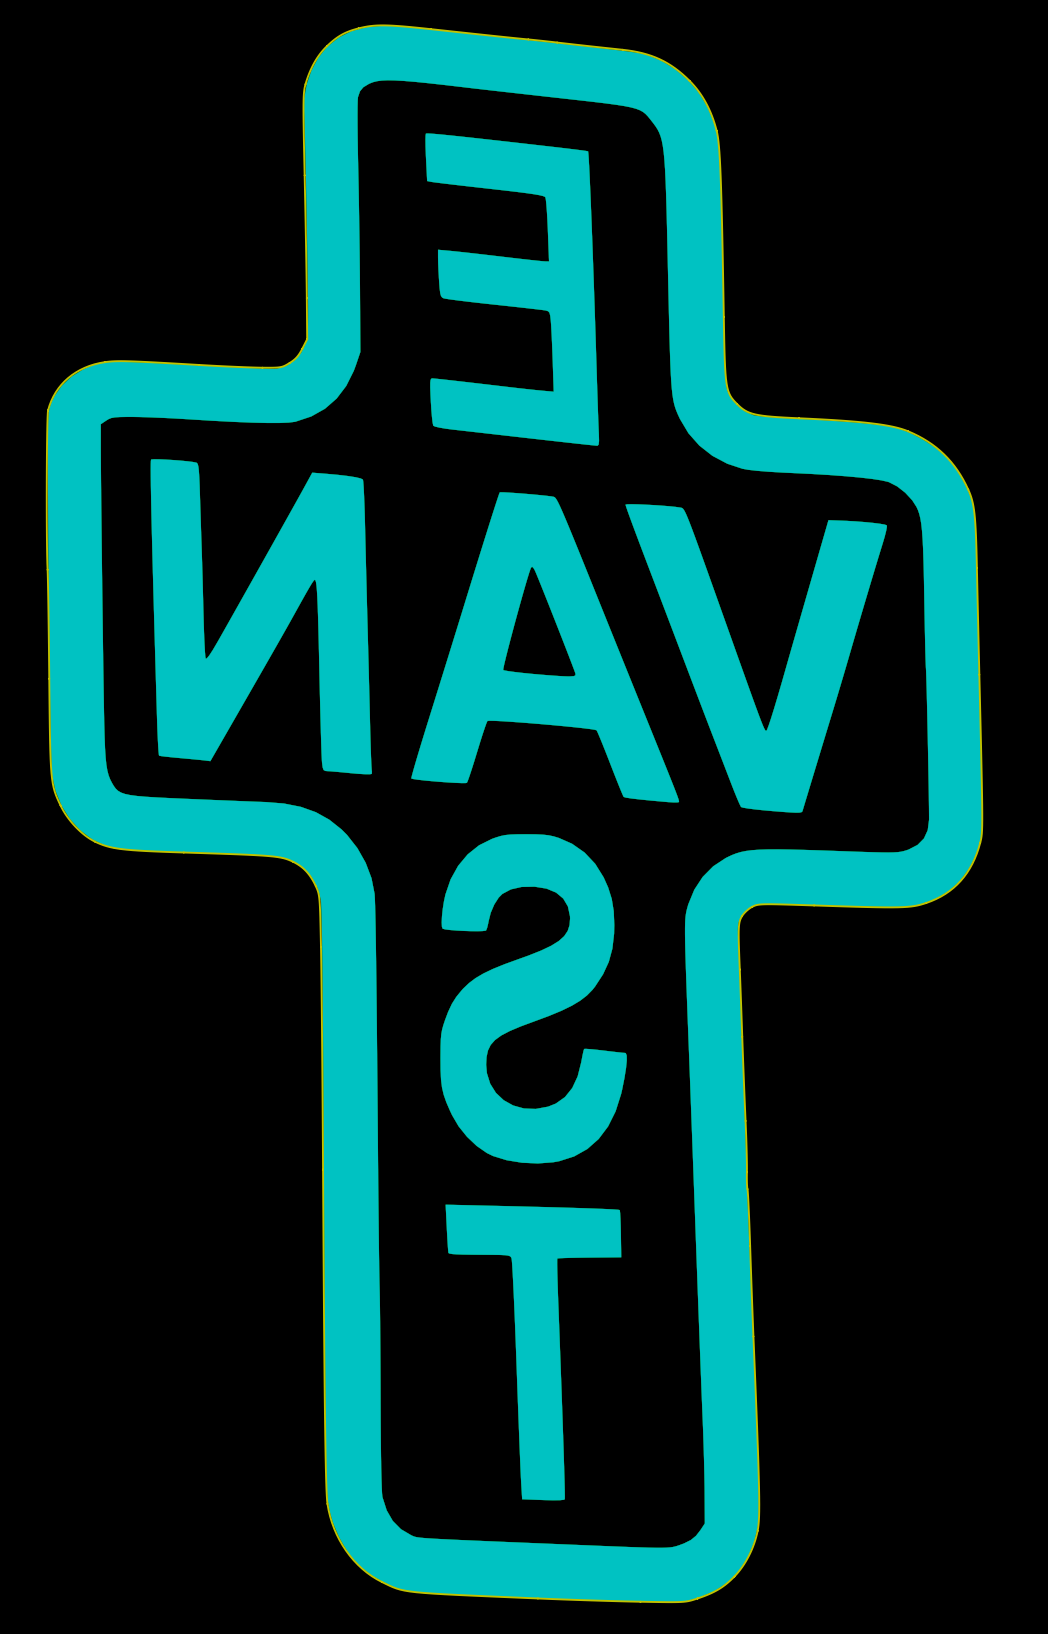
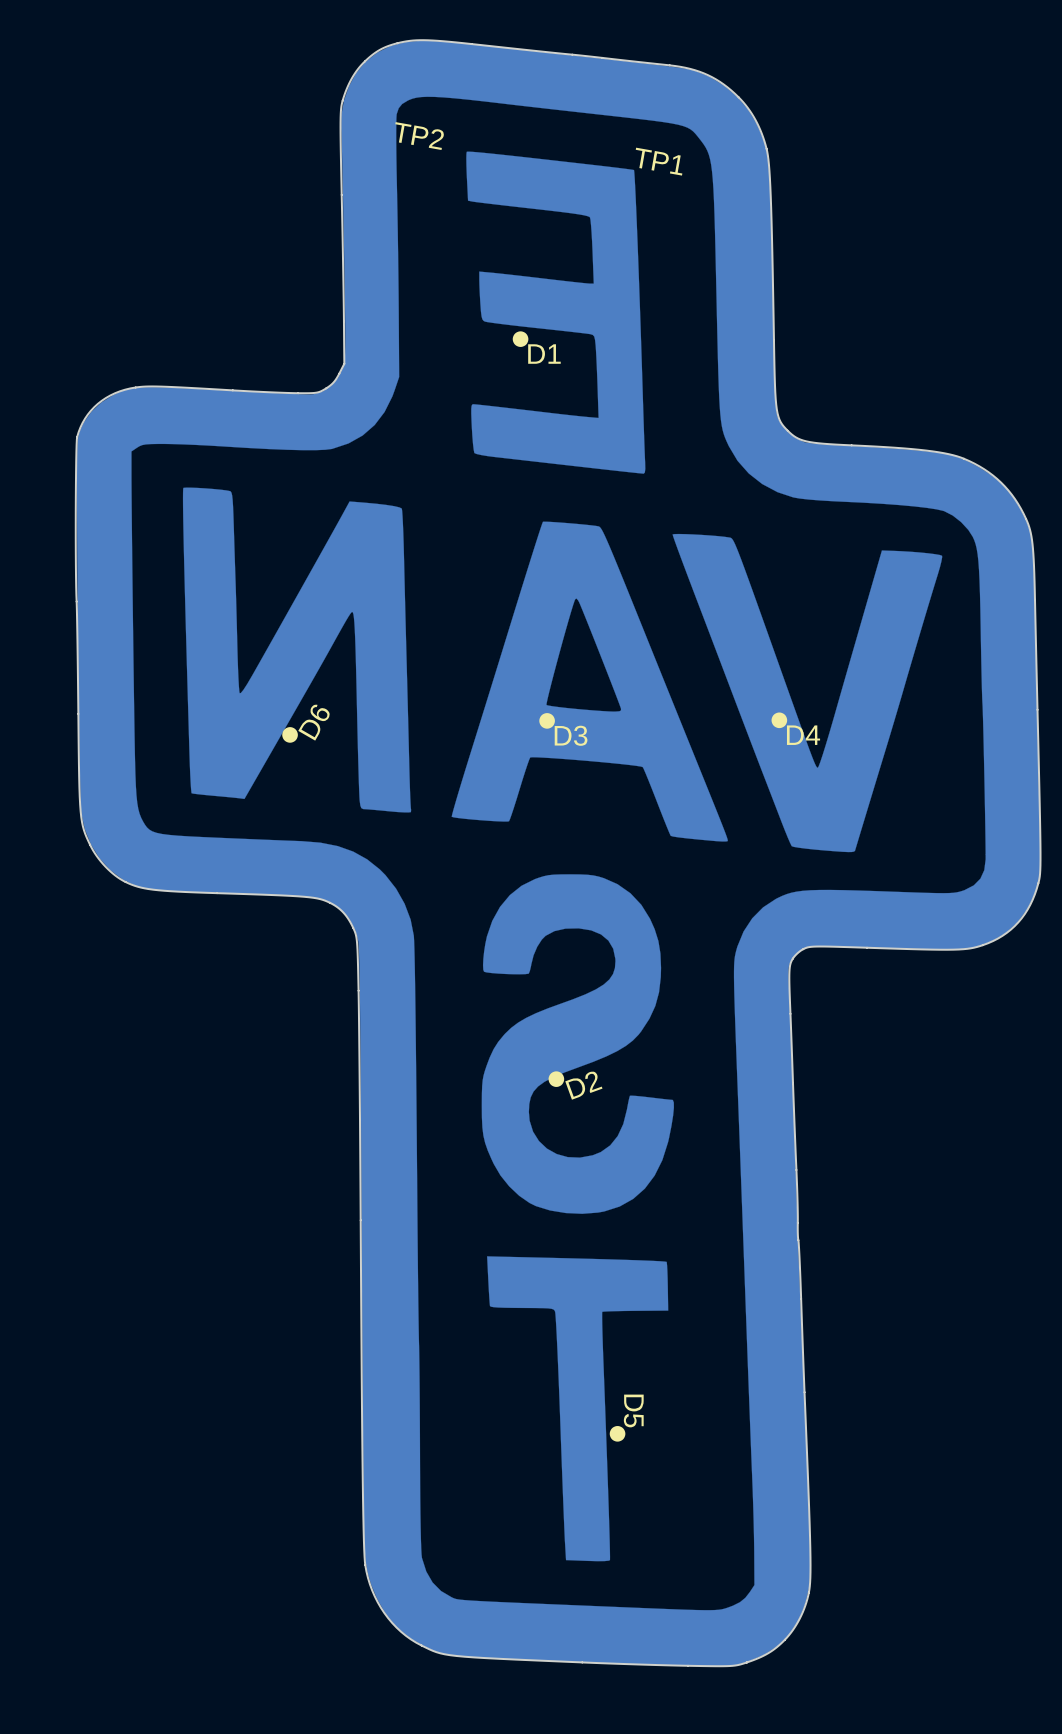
drawing: [47, 25, 983, 1603] -> none
TP2: none -> (419, 136)
TP1: none -> (659, 161)
D1: none -> (520, 339)
D4: none -> (779, 720)
D3: none -> (547, 720)
D6: none -> (290, 734)
D2: none -> (556, 1079)
D5: none -> (617, 1433)

